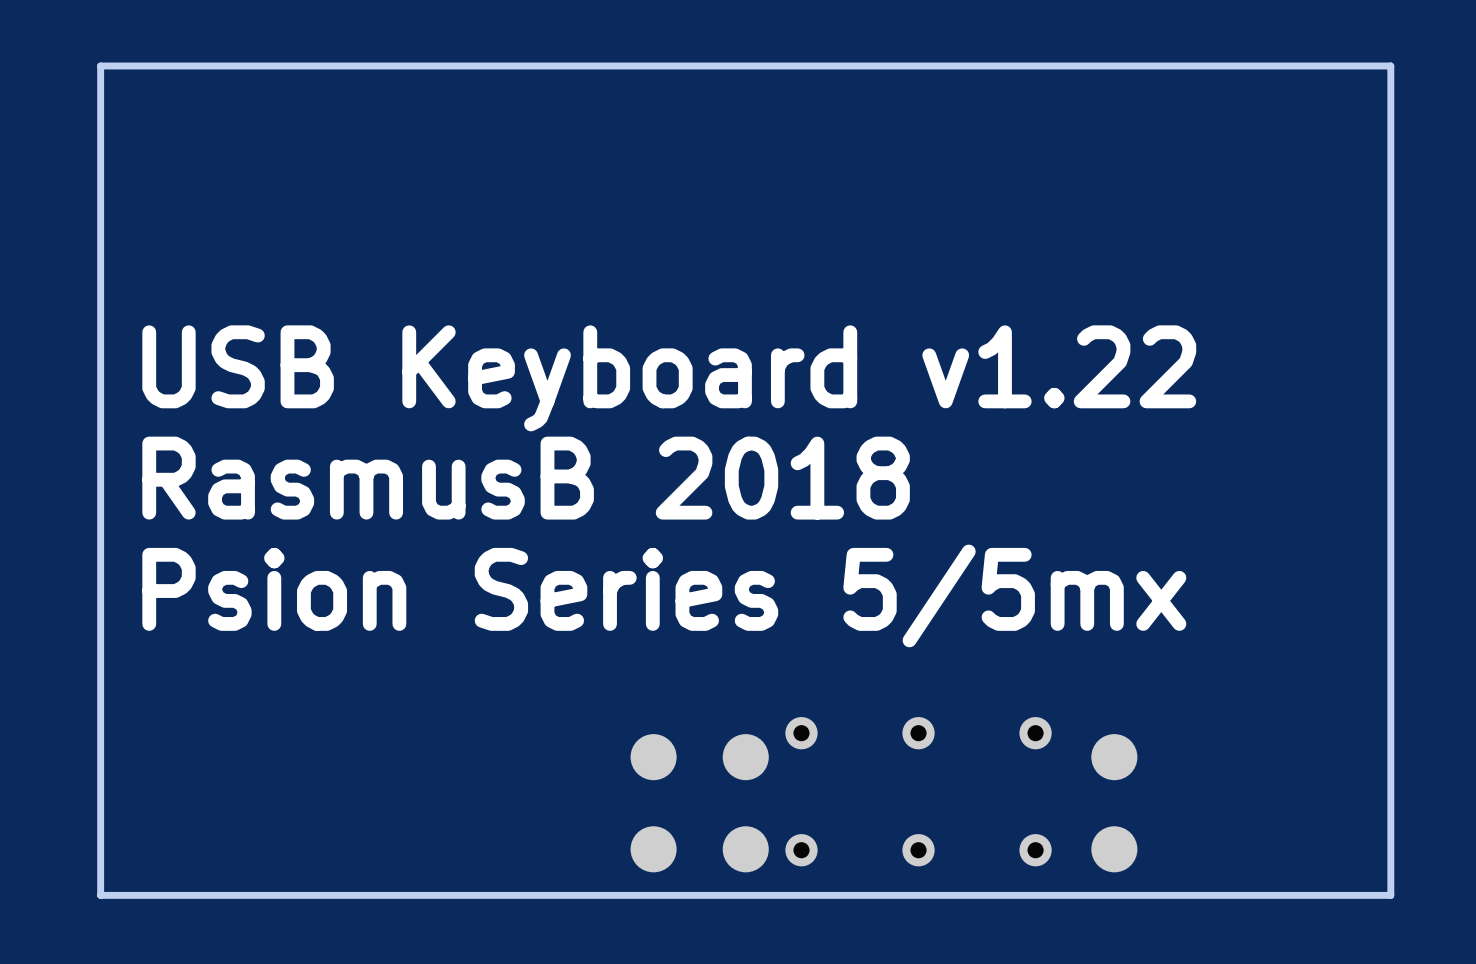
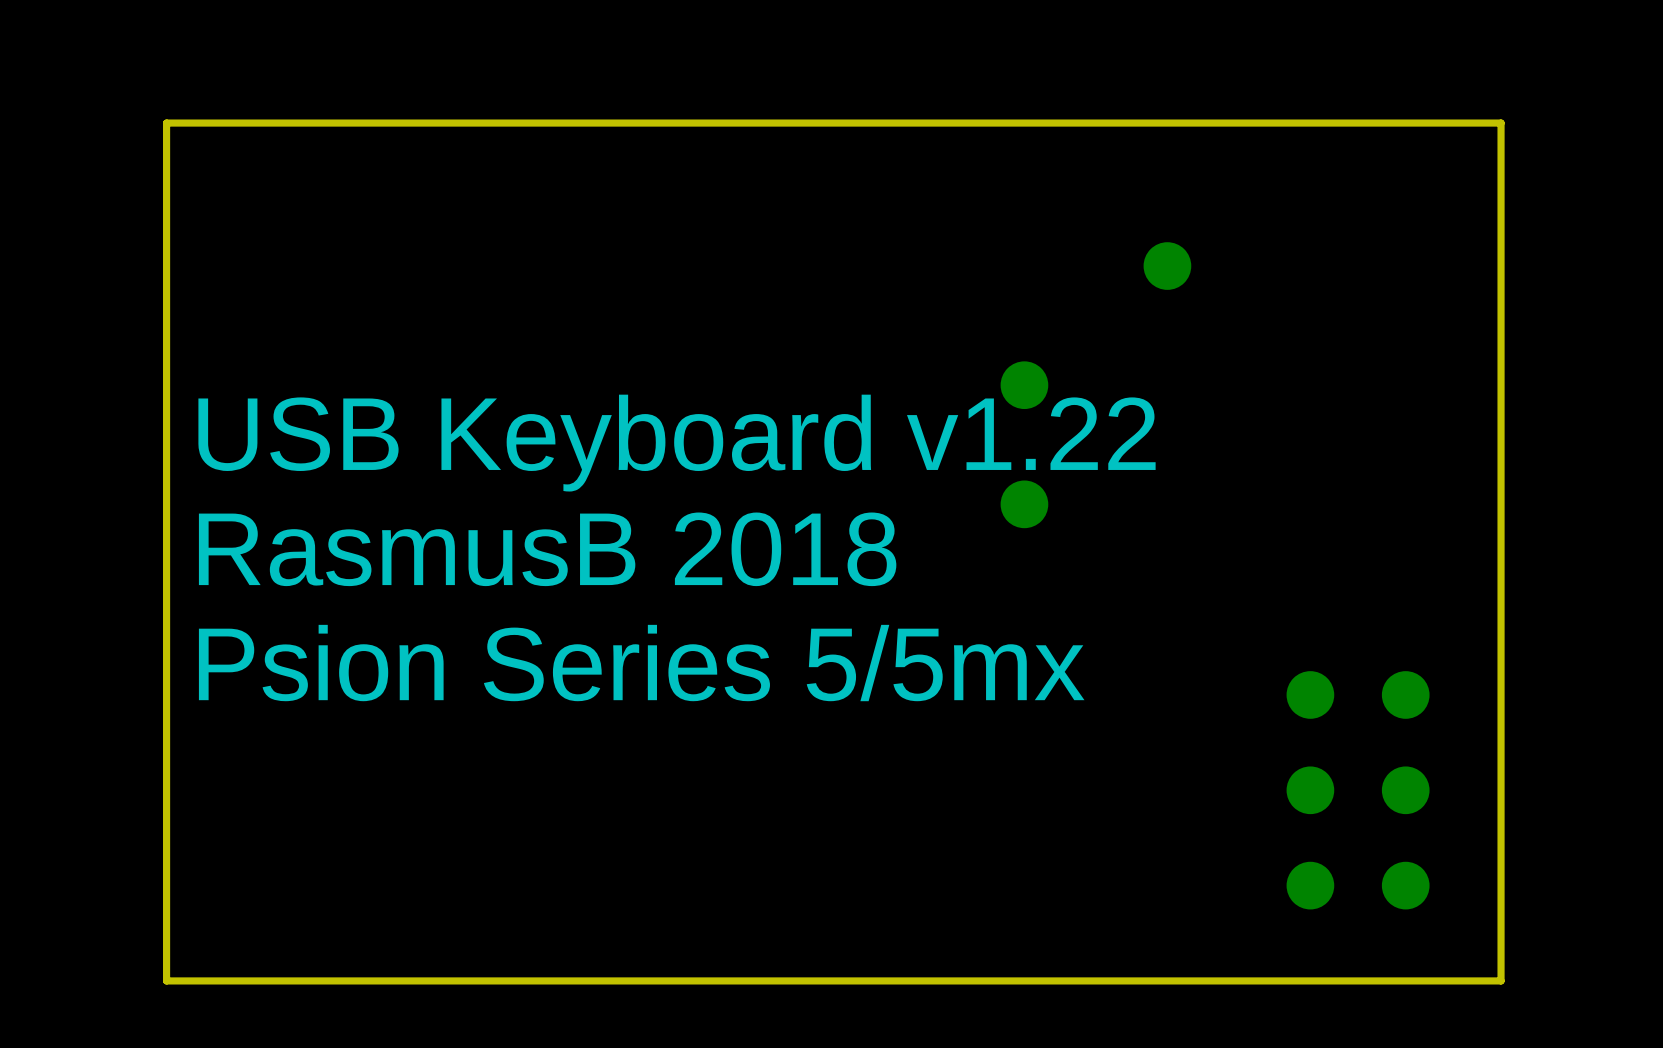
part: none -> (1167, 266)
part: none -> (1024, 385)
part: none -> (1024, 504)
part: none -> (1310, 694)
part: none -> (1405, 694)
part: none -> (1310, 790)
part: none -> (1405, 790)
part: (653, 757) -> none
part: (745, 757) -> none
part: (1114, 757) -> none
part: (918, 791) -> none
part: none -> (1310, 885)
part: none -> (1405, 885)
part: (653, 849) -> none
part: (745, 849) -> none
part: (1114, 849) -> none

